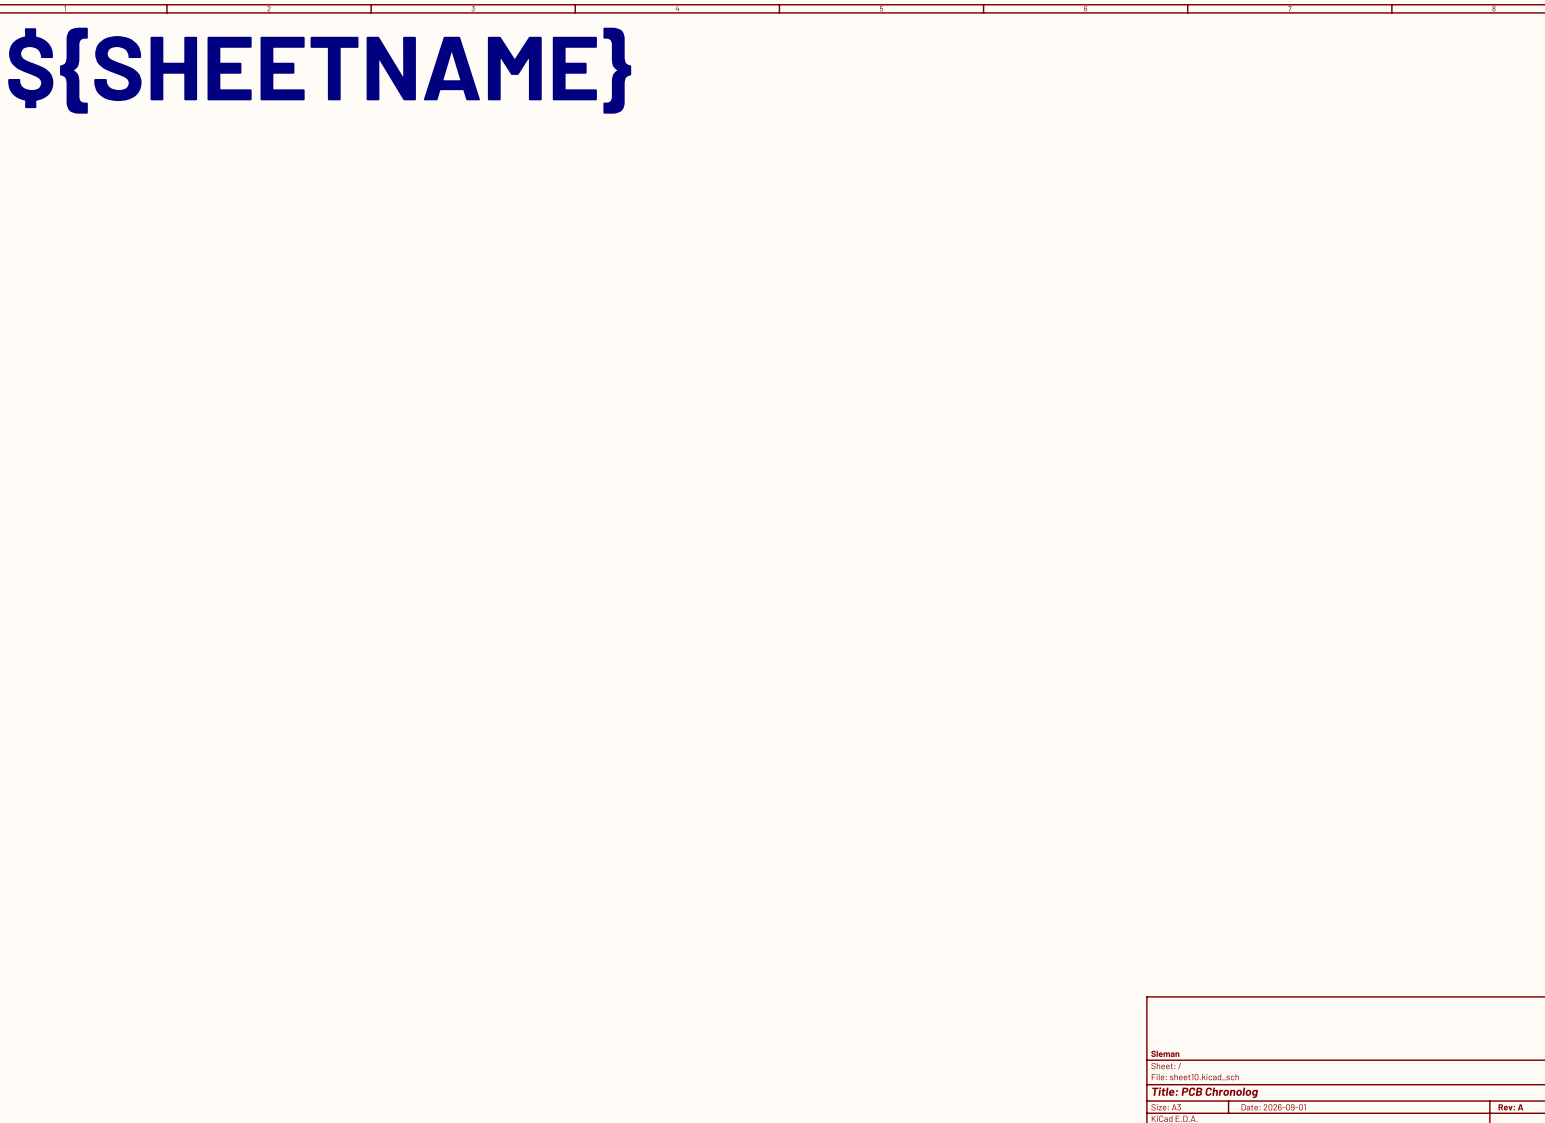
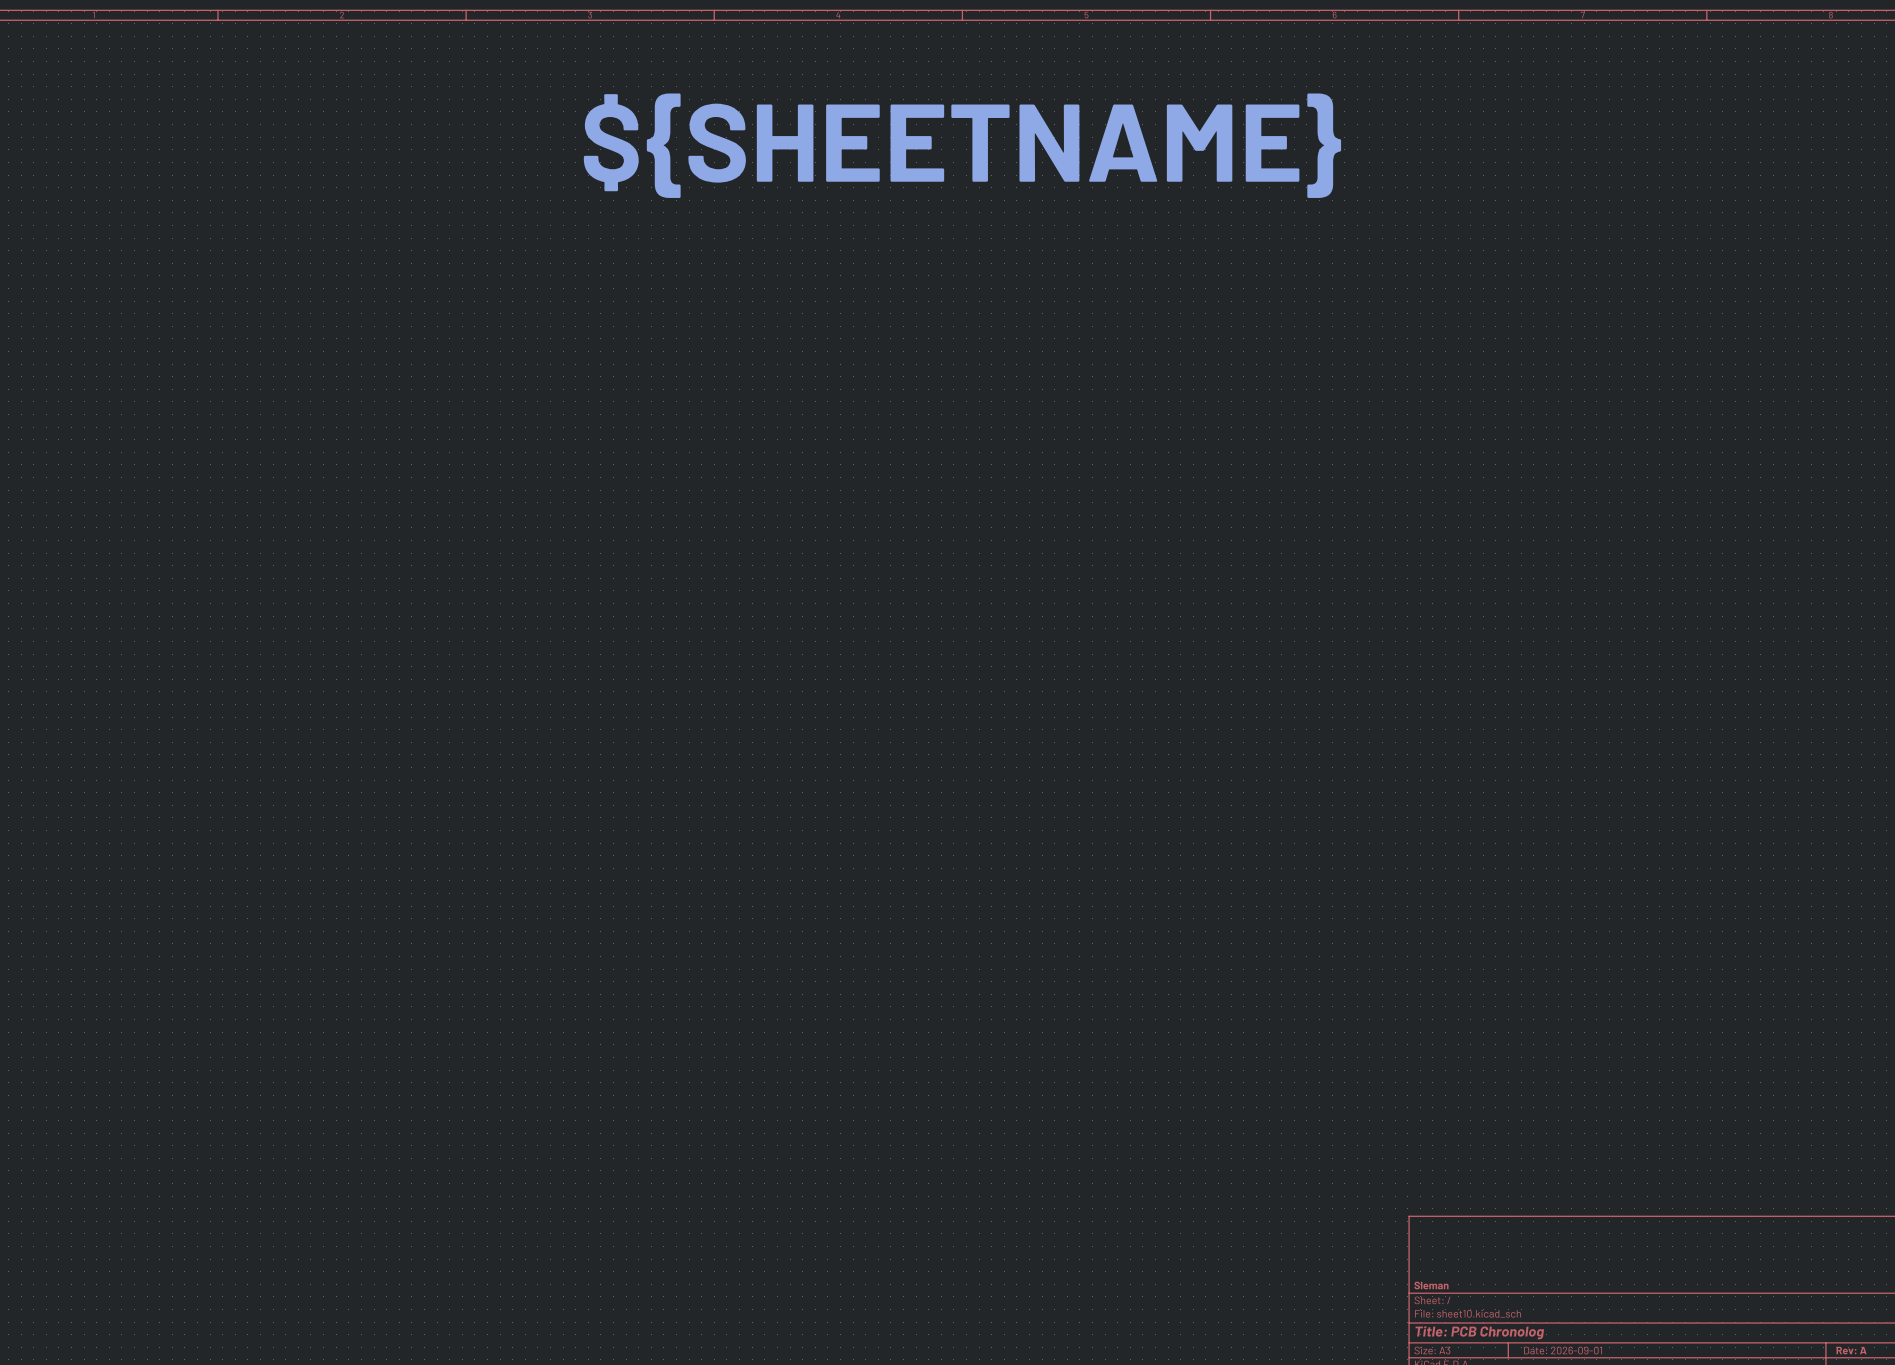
text: ${SHEETNAME} (319, 70) -> none
text: none -> ${SHEETNAME} (962, 145)

